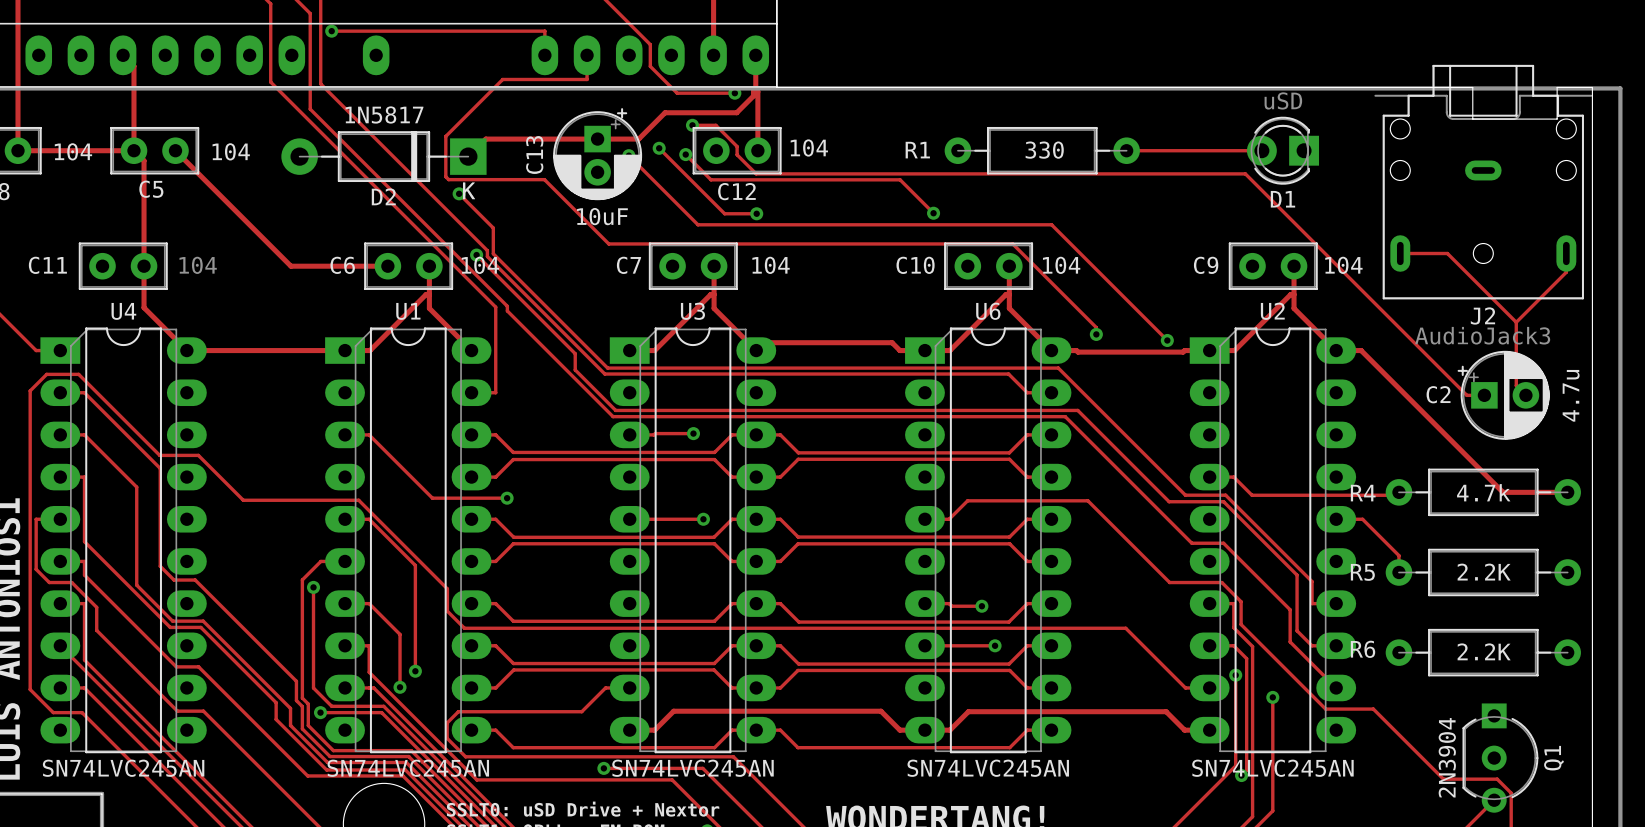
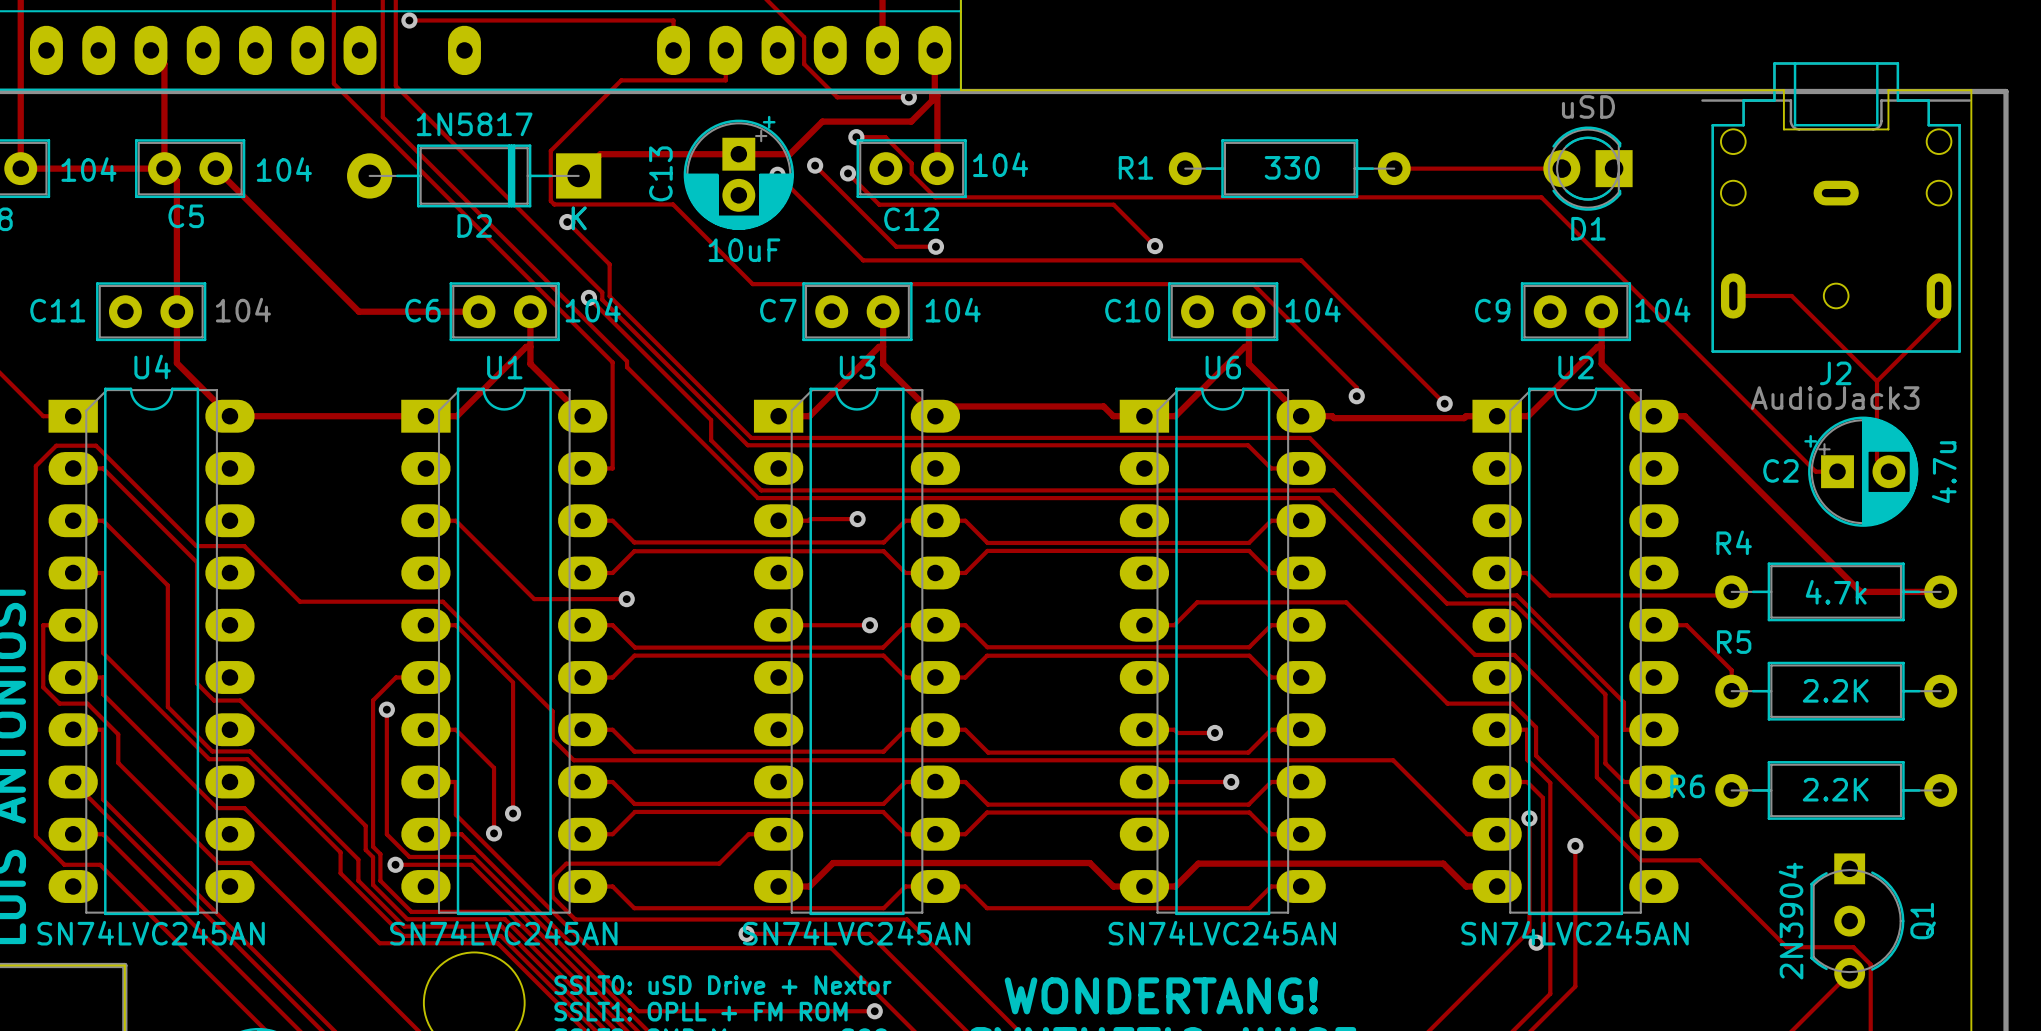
board edge: (1441, 87) (1472, 87) (1472, 119) -> (1783, 90) (1783, 129) (1823, 129)
board edge: (1557, 87) (1557, 119) (1525, 119) -> (1927, 90) (1888, 90) (1888, 129)
R4 name position: R4 (1363, 493) -> R4 (1734, 542)
R5 name position: R5 (1362, 572) -> R5 (1734, 642)

